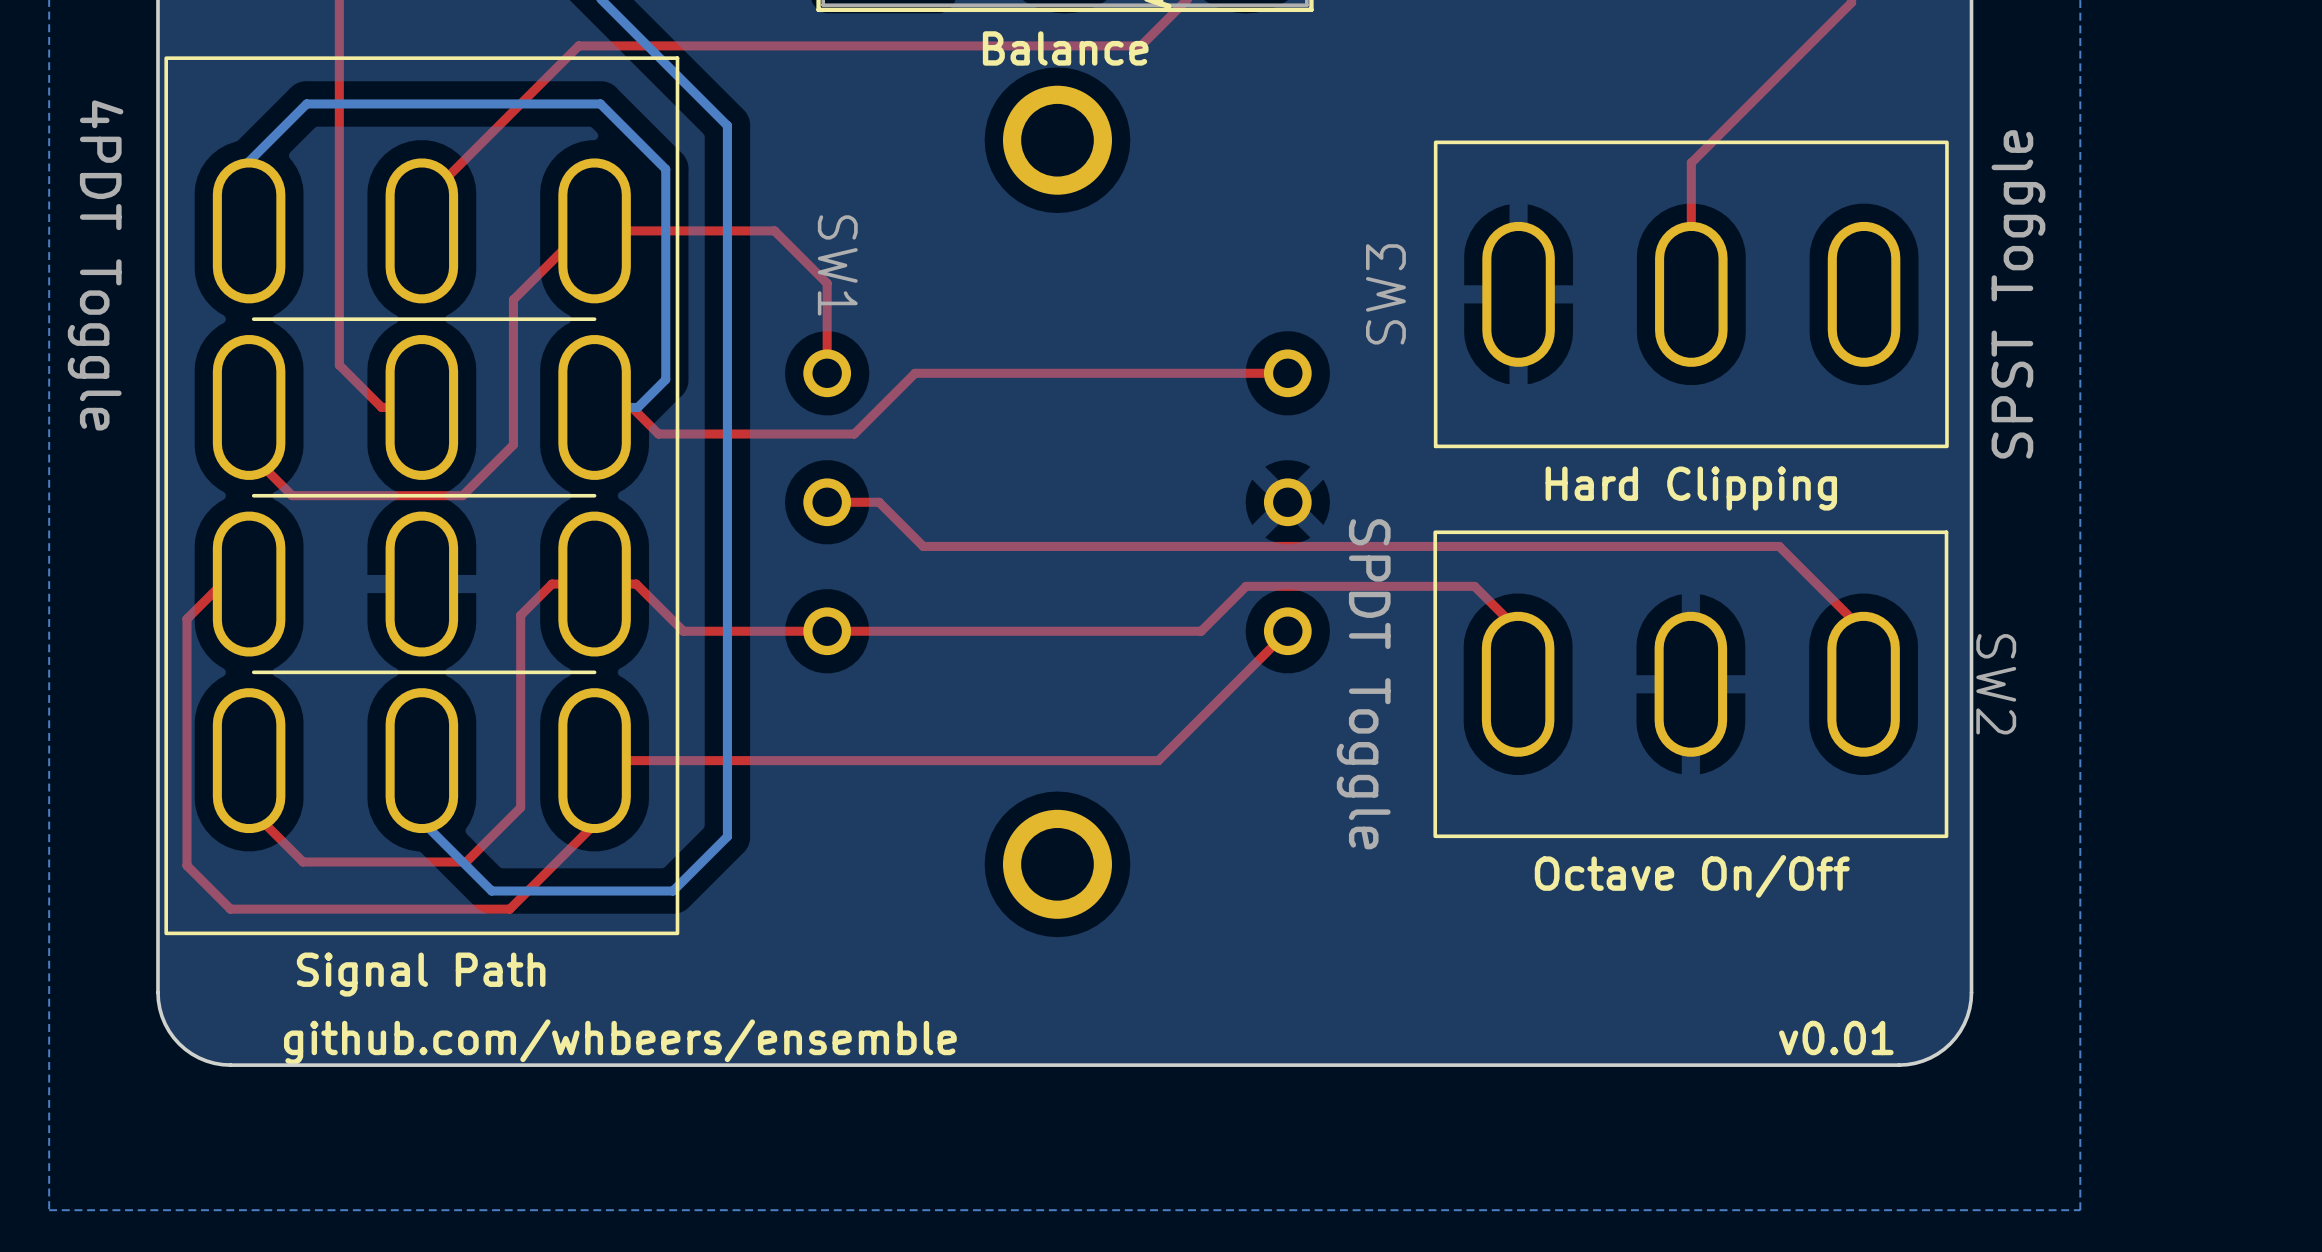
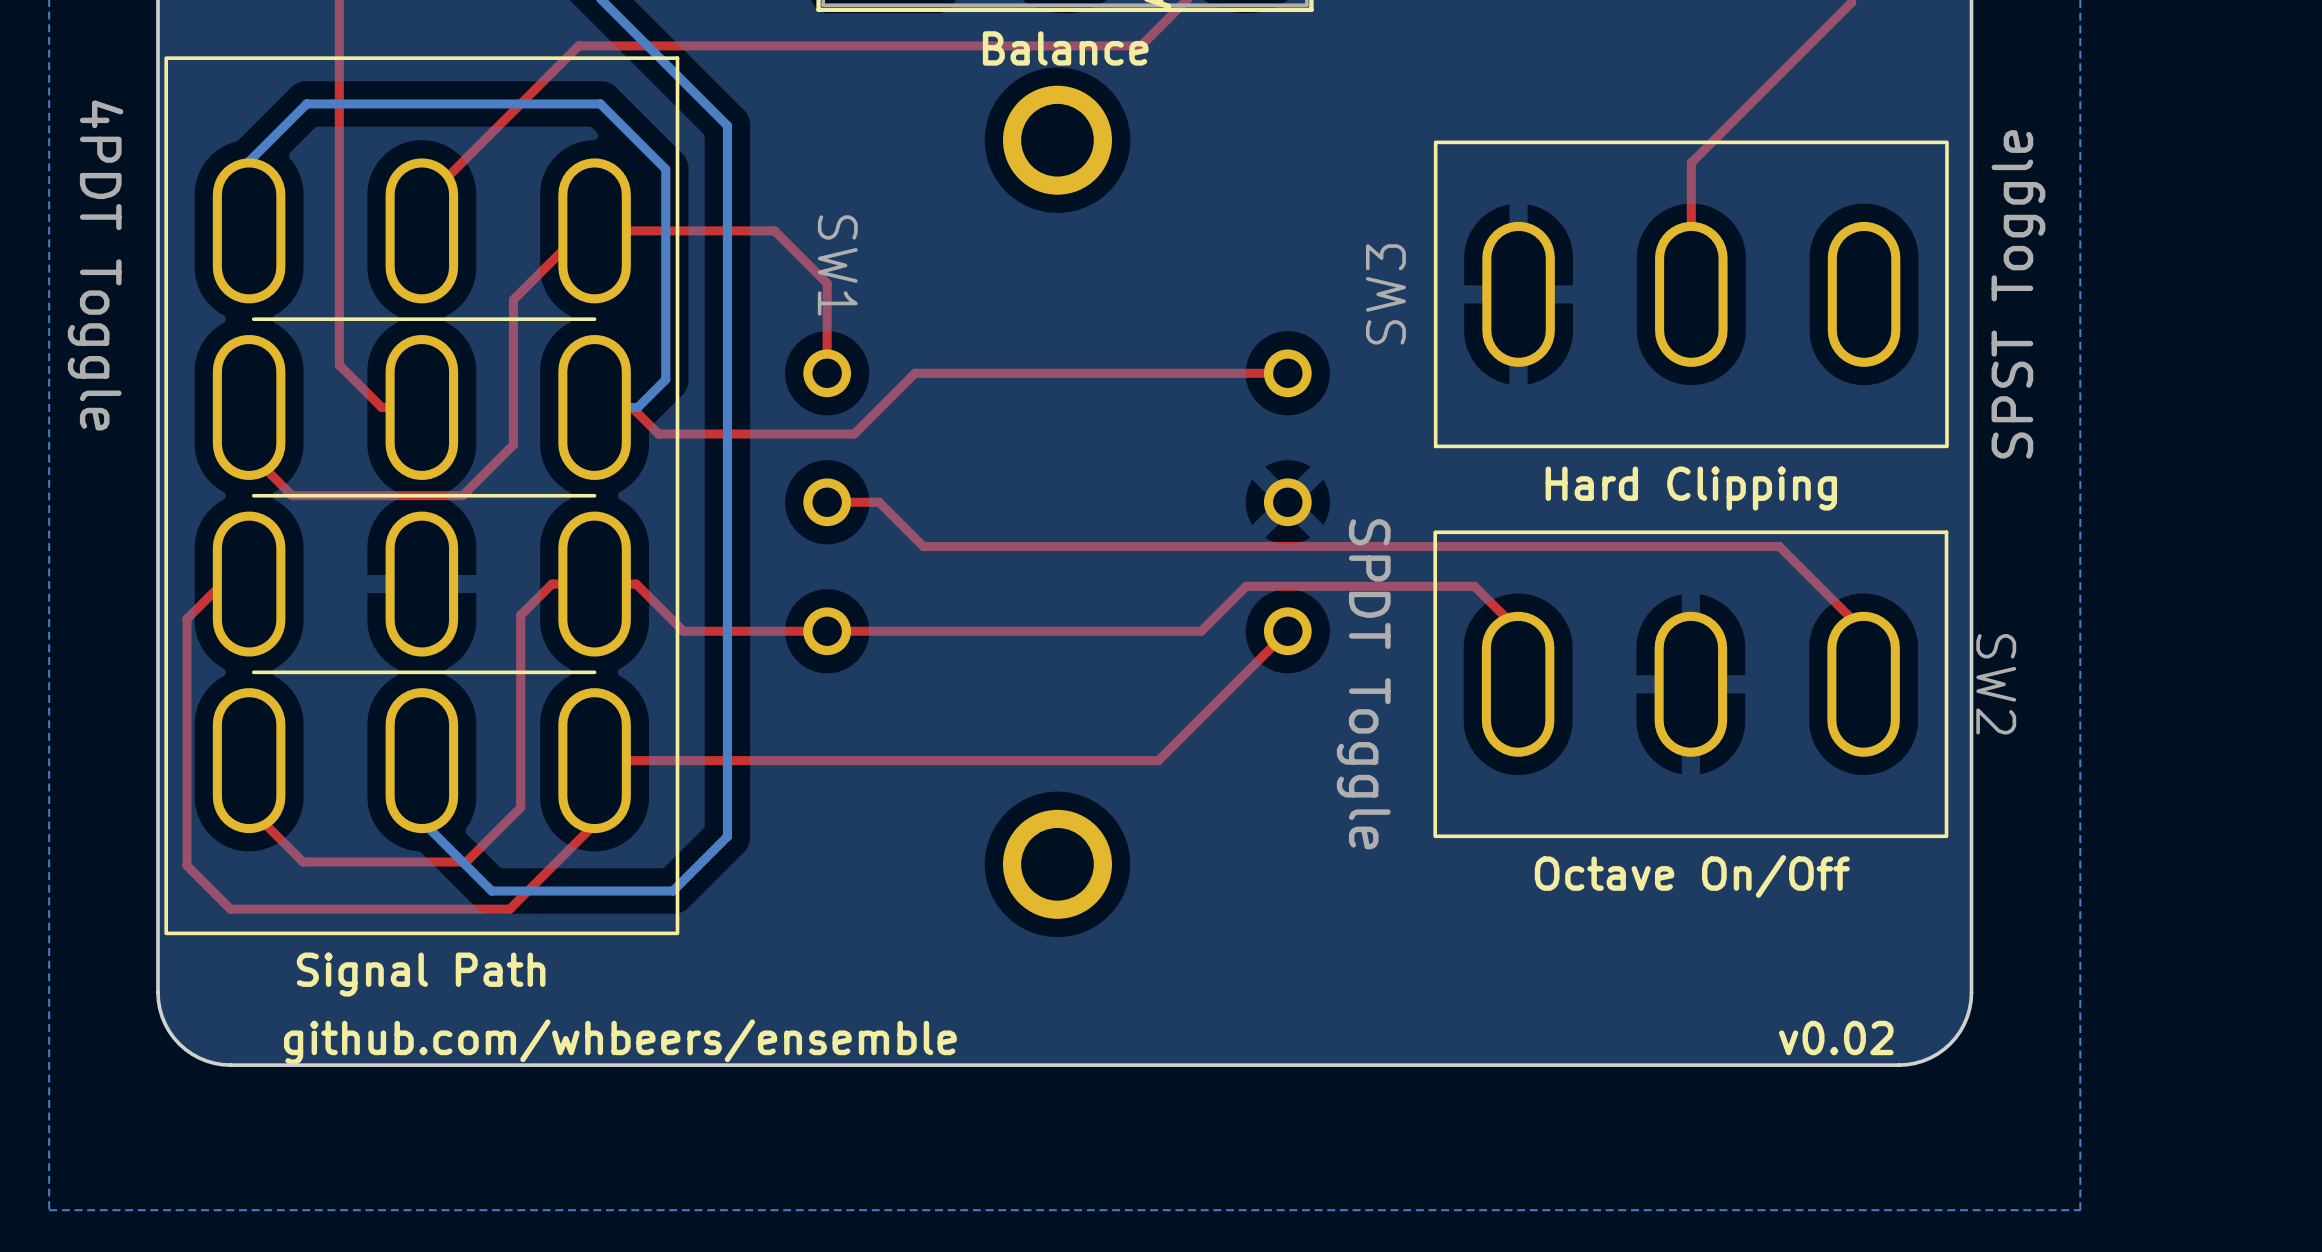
text: github.com/whbeers/ensemble v0.01 (1088, 1042) -> github.com/whbeers/ensemble v0.02 (1088, 1042)

